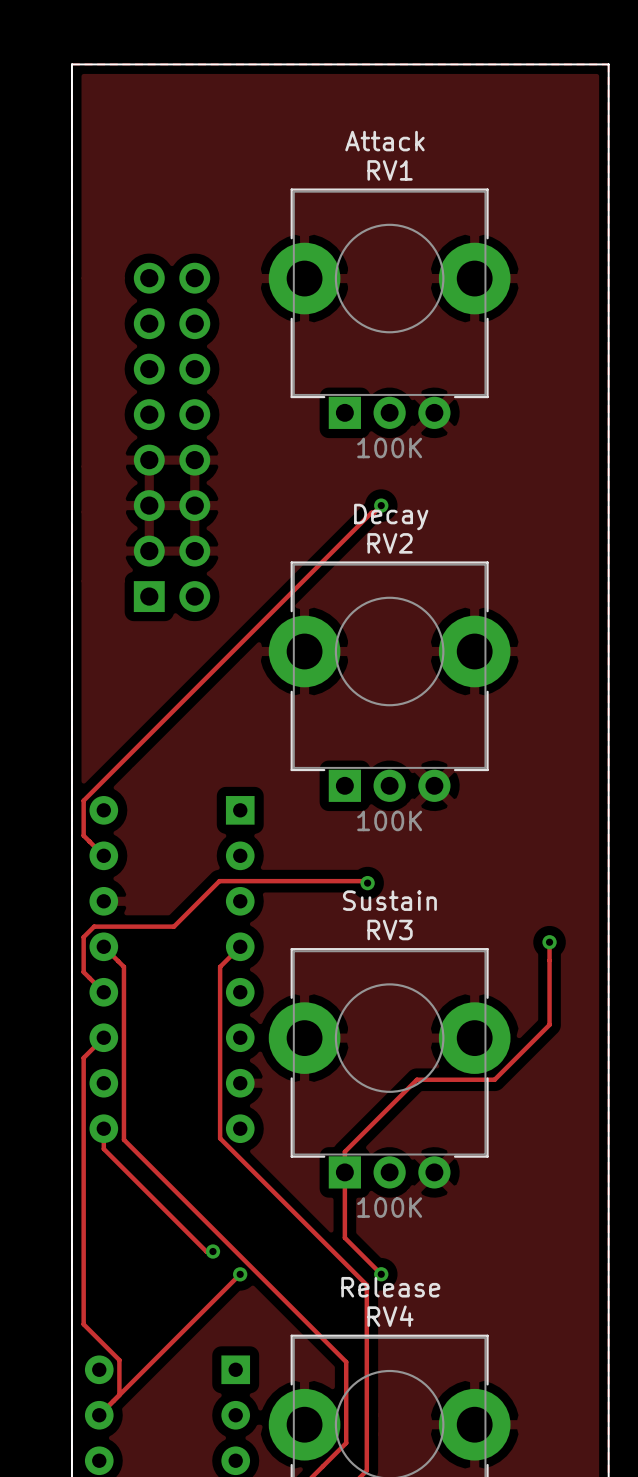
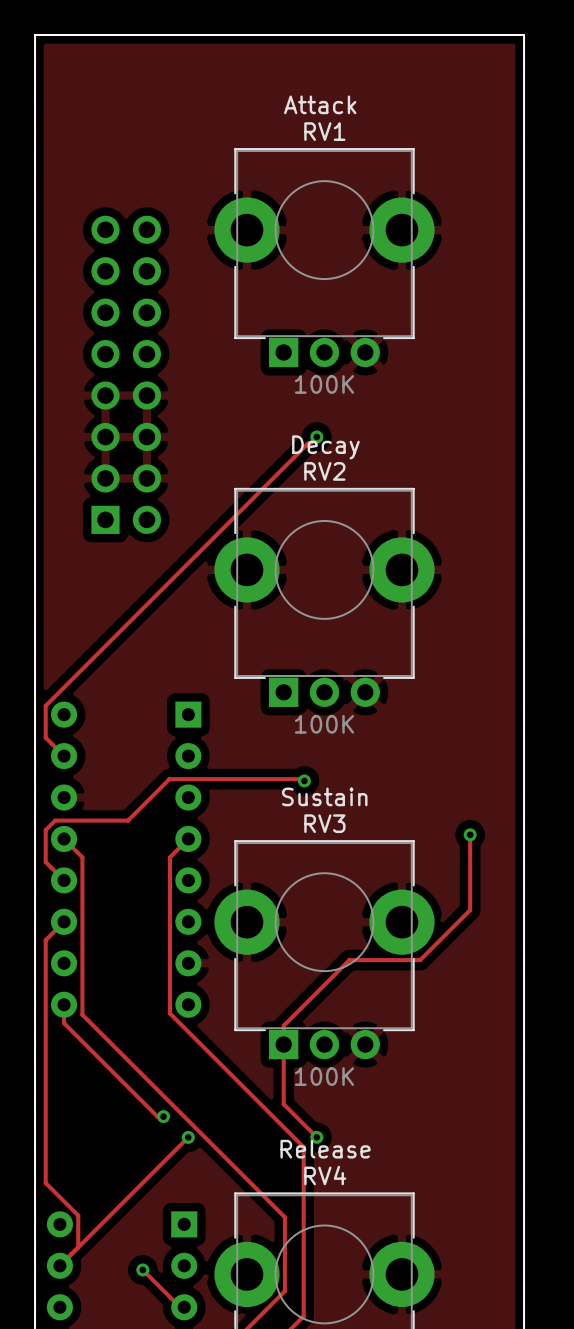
track: none -> (142, 1269) (180, 1307)
via: none -> (142, 1269)

